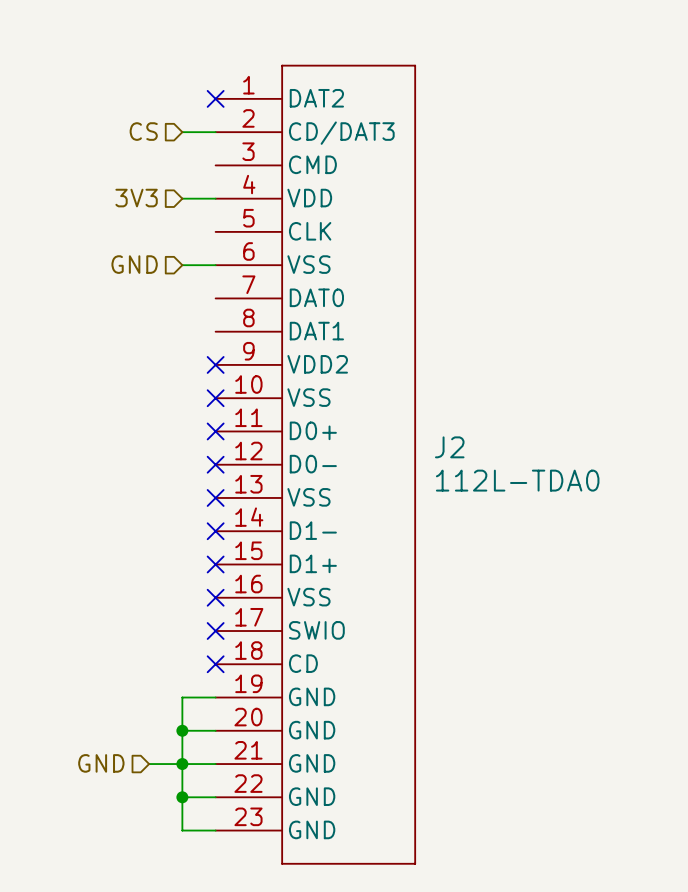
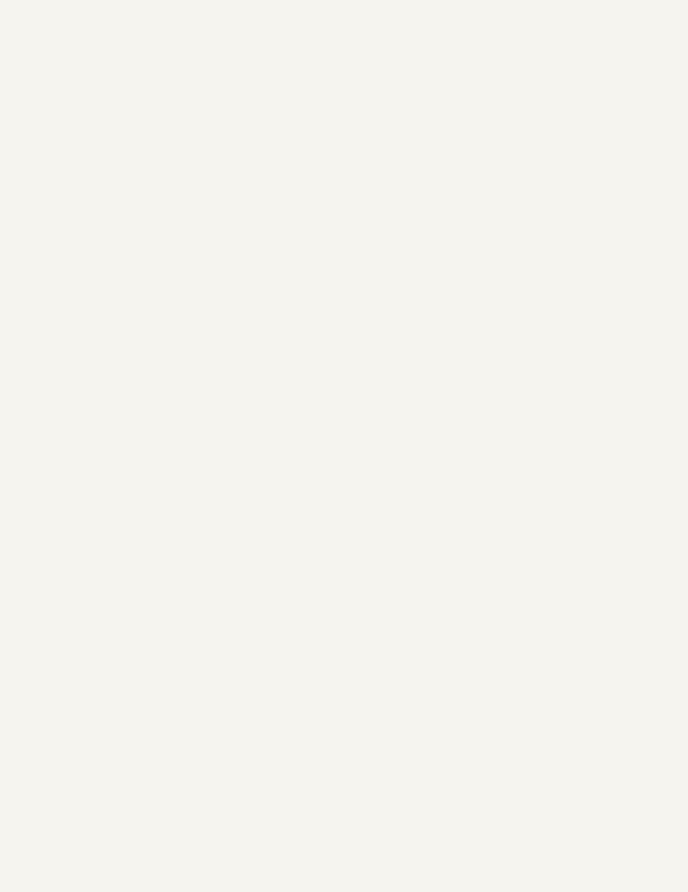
no-connect mark: (215, 98) -> none
hierarchical label: CS (143, 131) -> none
wire: (182, 132) (215, 132) -> none
hierarchical label: 3V3 (136, 198) -> none
wire: (182, 198) (215, 198) -> none
hierarchical label: GND (134, 264) -> none
wire: (182, 265) (215, 265) -> none
no-connect mark: (215, 364) -> none
no-connect mark: (215, 398) -> none
no-connect mark: (215, 431) -> none
no-connect mark: (215, 464) -> none
J2: 112L-TDA0 (315, 464) -> none
no-connect mark: (215, 497) -> none
no-connect mark: (215, 531) -> none
no-connect mark: (215, 564) -> none
no-connect mark: (215, 597) -> none
no-connect mark: (215, 631) -> none
no-connect mark: (215, 664) -> none
wire: (215, 697) (182, 697) (182, 830) (215, 830) -> none
wire: (182, 730) (215, 730) -> none
junction: (182, 730) -> none
hierarchical label: GND (101, 763) -> none
wire: (149, 764) (215, 764) -> none
junction: (182, 764) -> none
wire: (182, 797) (215, 797) -> none
junction: (182, 797) -> none

